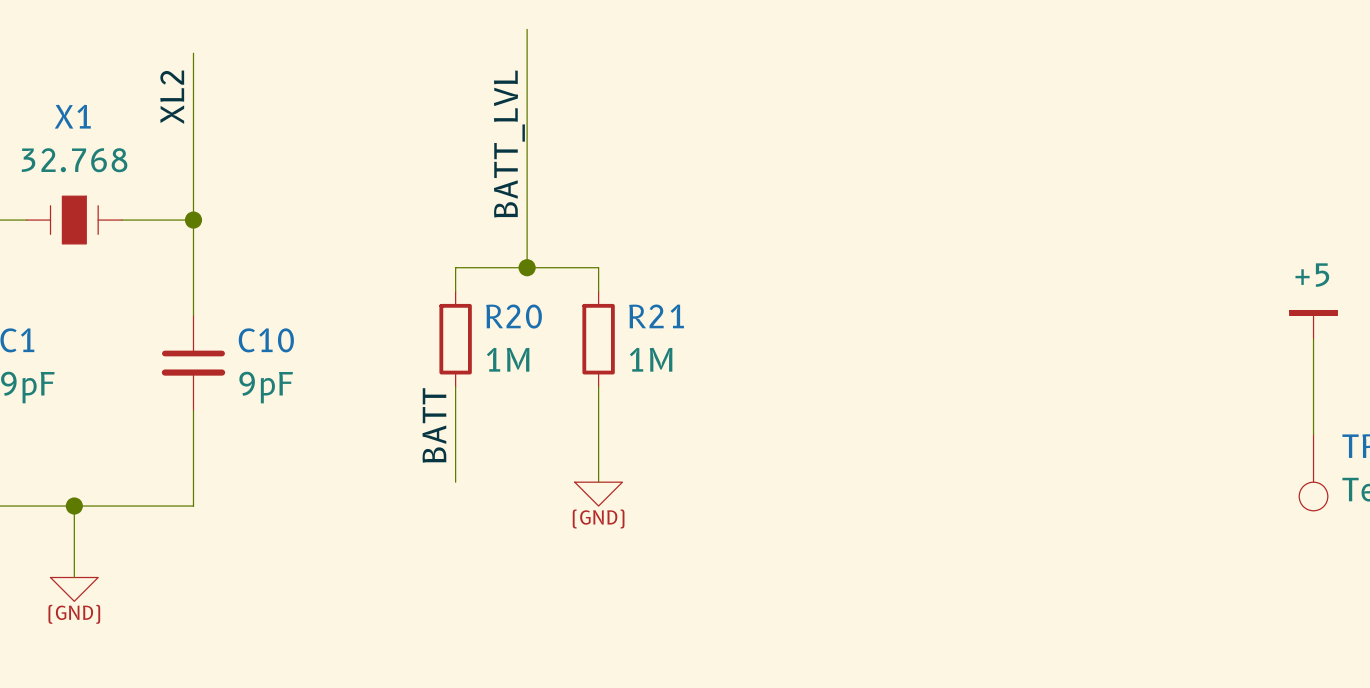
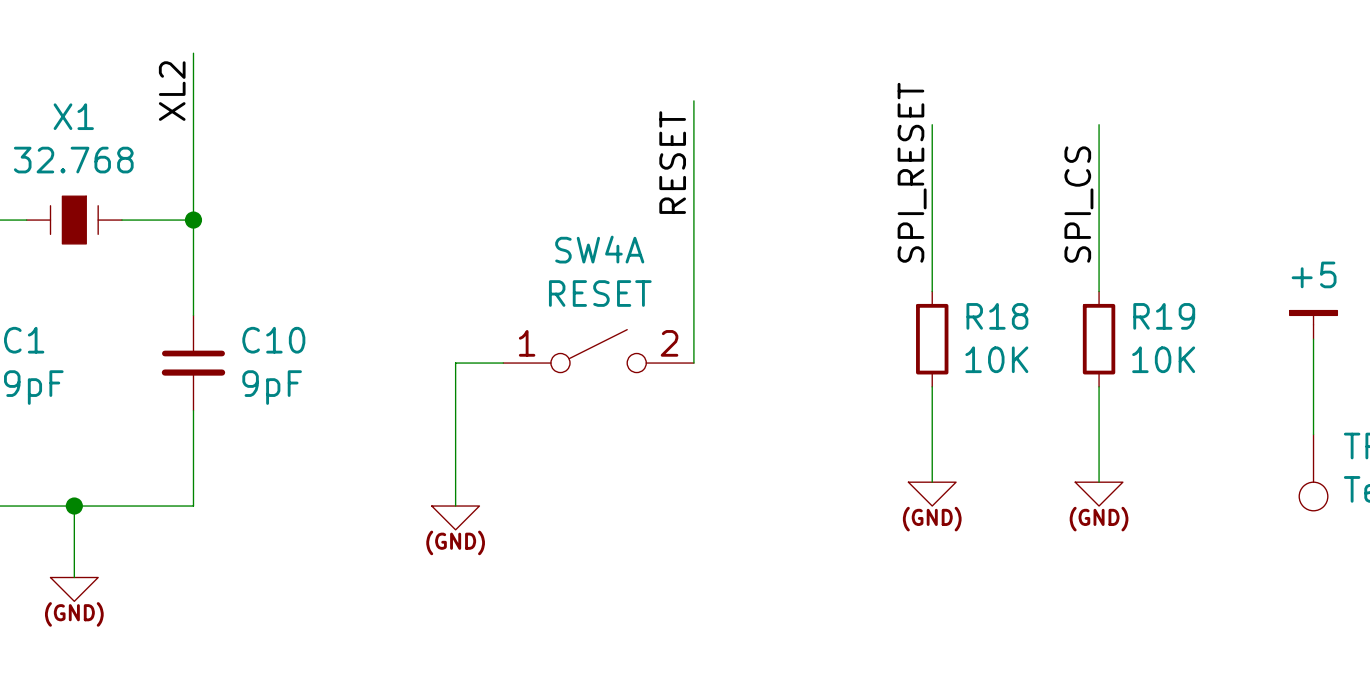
wire: (527, 29) (527, 267) -> none
wire: none -> (693, 100) (693, 363)
wire: none -> (932, 124) (932, 291)
wire: none -> (1099, 124) (1099, 291)
label: BATT_LVL (509, 144) -> none
label: none -> RESET (672, 162)
label: none -> SPI_RESET (912, 172)
label: none -> SPI_CS (1078, 204)
junction: (527, 267) -> none
wire: (455, 291) (455, 267) (598, 267) (598, 291) -> none
R20: 1M (455, 339) -> none
R21: 1M (598, 339) -> none
R18: none -> 10K (932, 339)
R19: none -> 10K (1099, 339)
SW4A: none -> RESET (598, 351)
wire: none -> (503, 363) (455, 363) (455, 386)
wire: (598, 386) (598, 482) -> (932, 386) (932, 482)
wire: none -> (1099, 386) (1099, 482)
label: BATT (434, 425) -> none
wire: none -> (455, 482) (455, 506)
power symbol position: (598, 494) -> (455, 517)
power symbol: none -> (932, 494)
power symbol: none -> (1099, 494)

